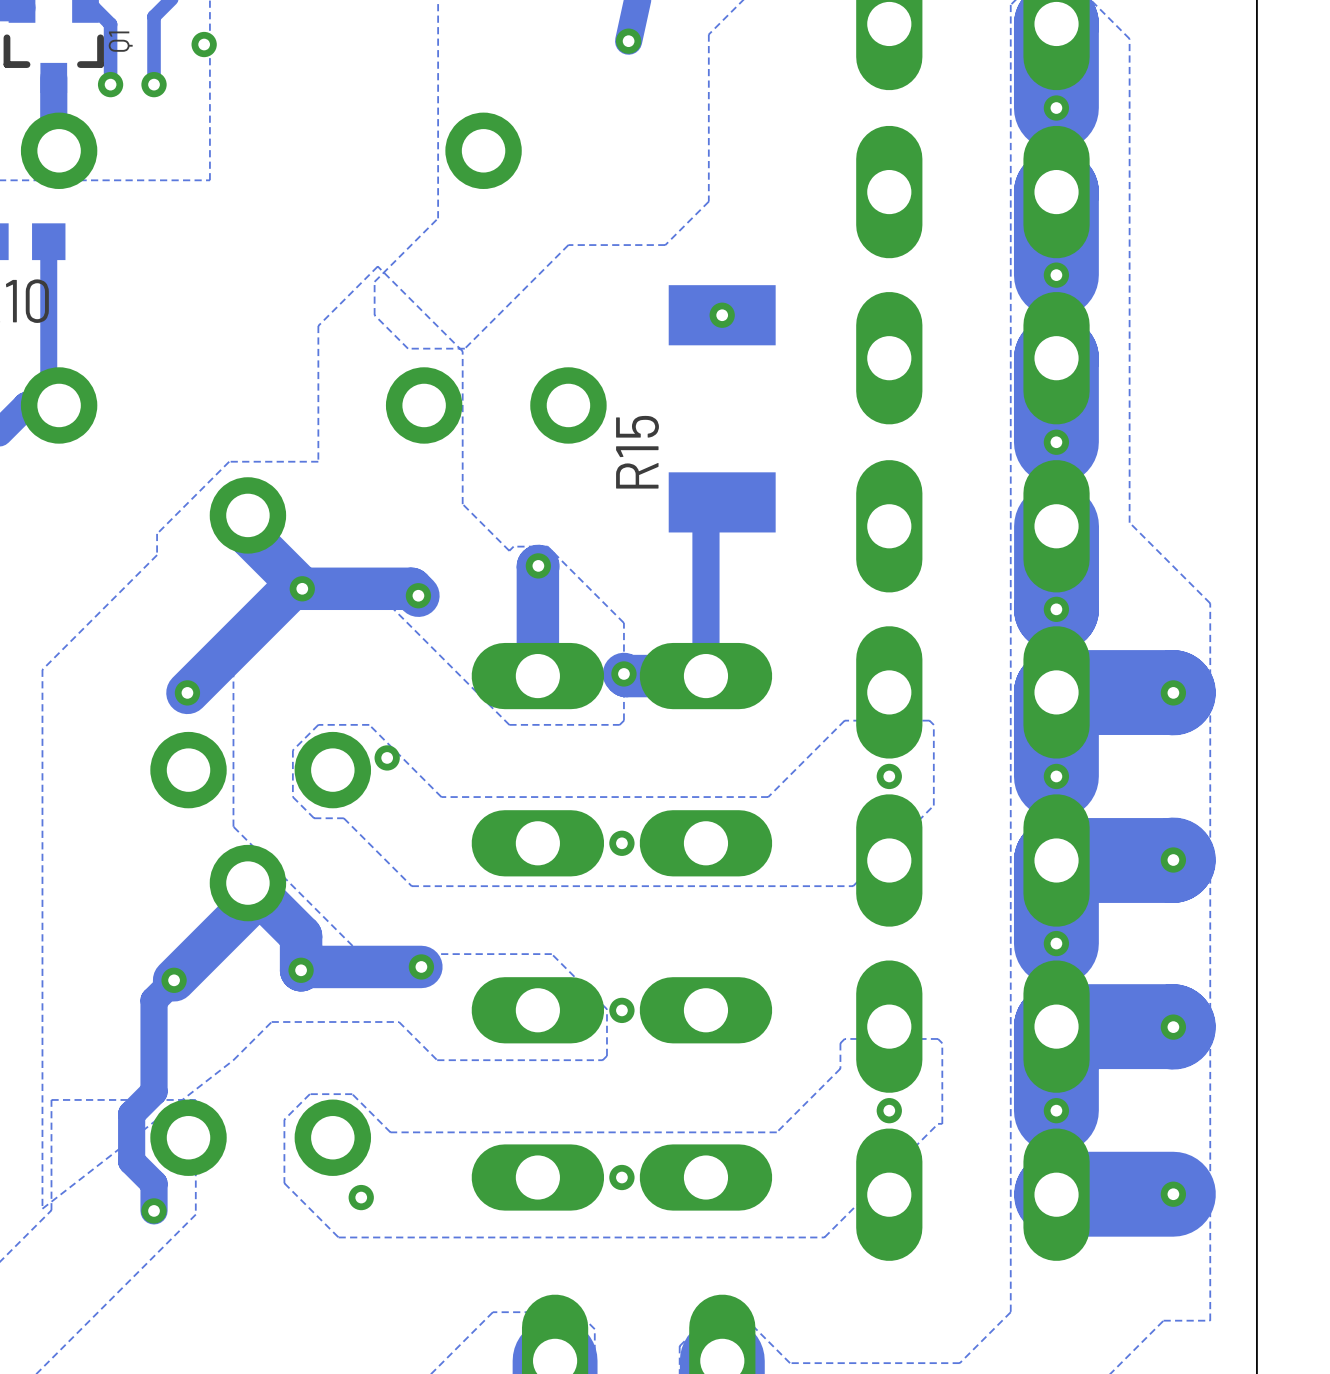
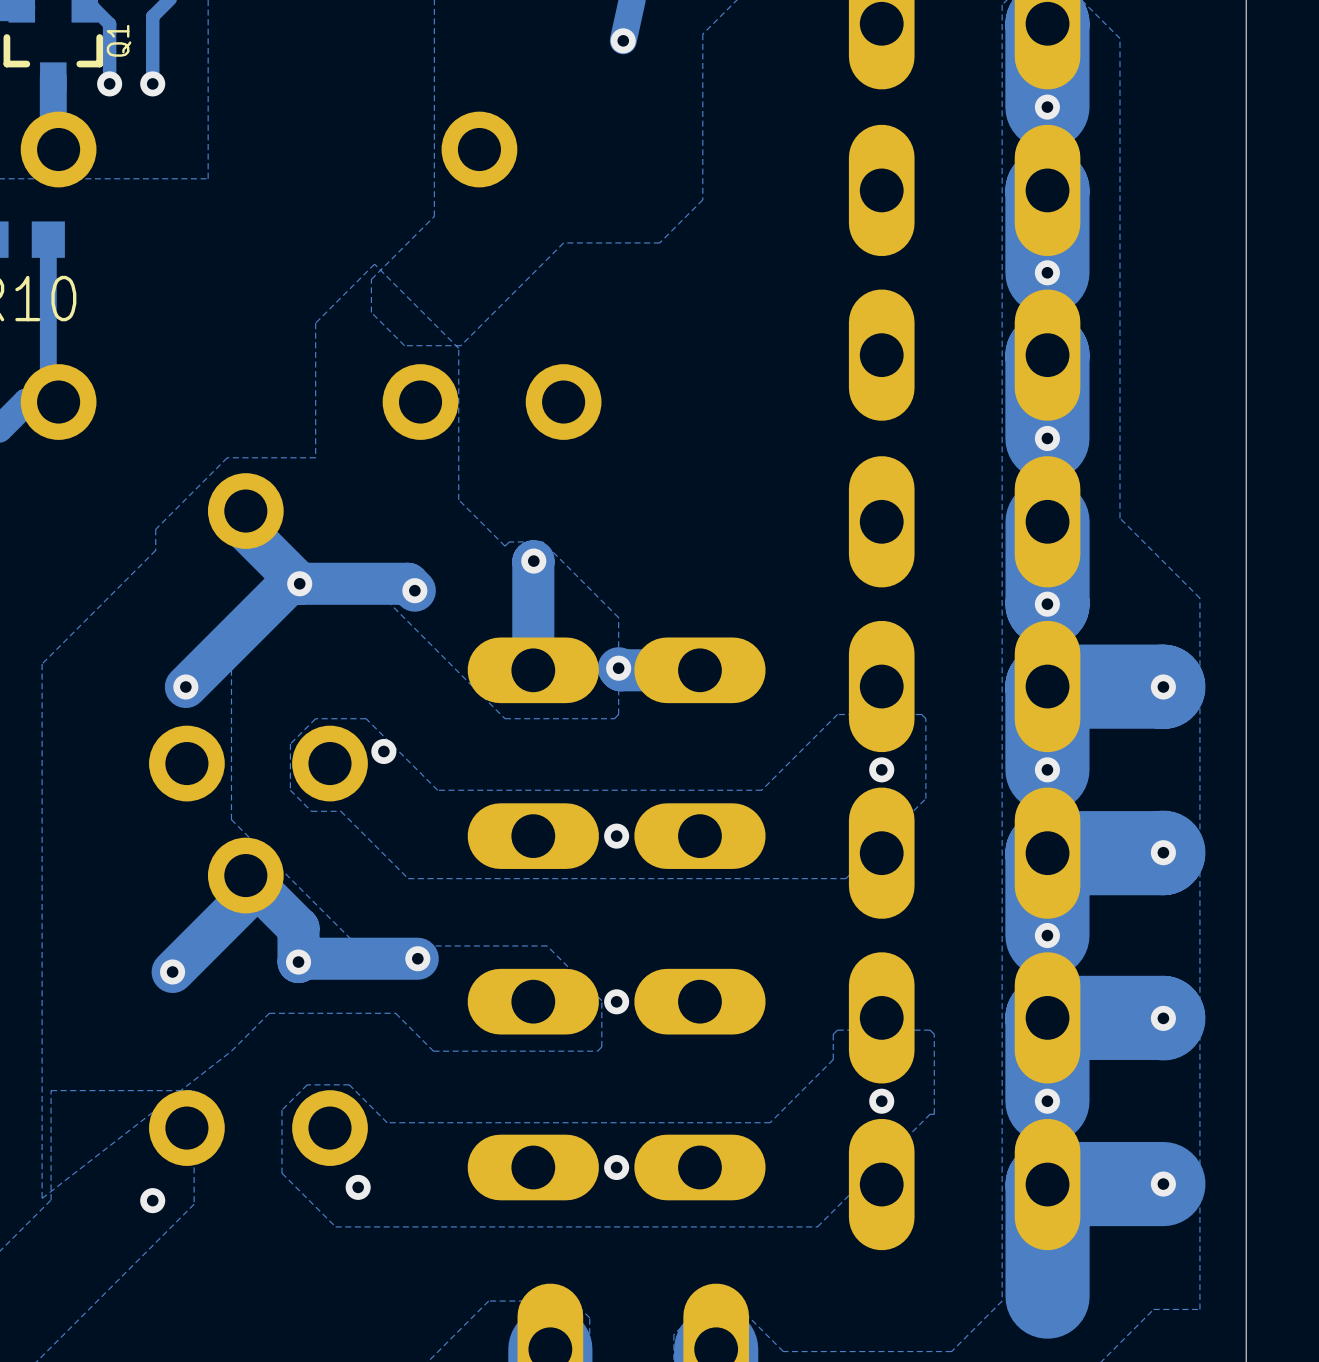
via: (204, 44) -> none
via: (722, 315) -> none
R15: (722, 408) -> none
track: (722, 502) (705, 518) (705, 676) -> none
track: (174, 980) (154, 1000) (154, 1091) (131, 1114) (131, 1161) (154, 1183) (154, 1210) -> none
track: none -> (1047, 1184) (1047, 1296)

